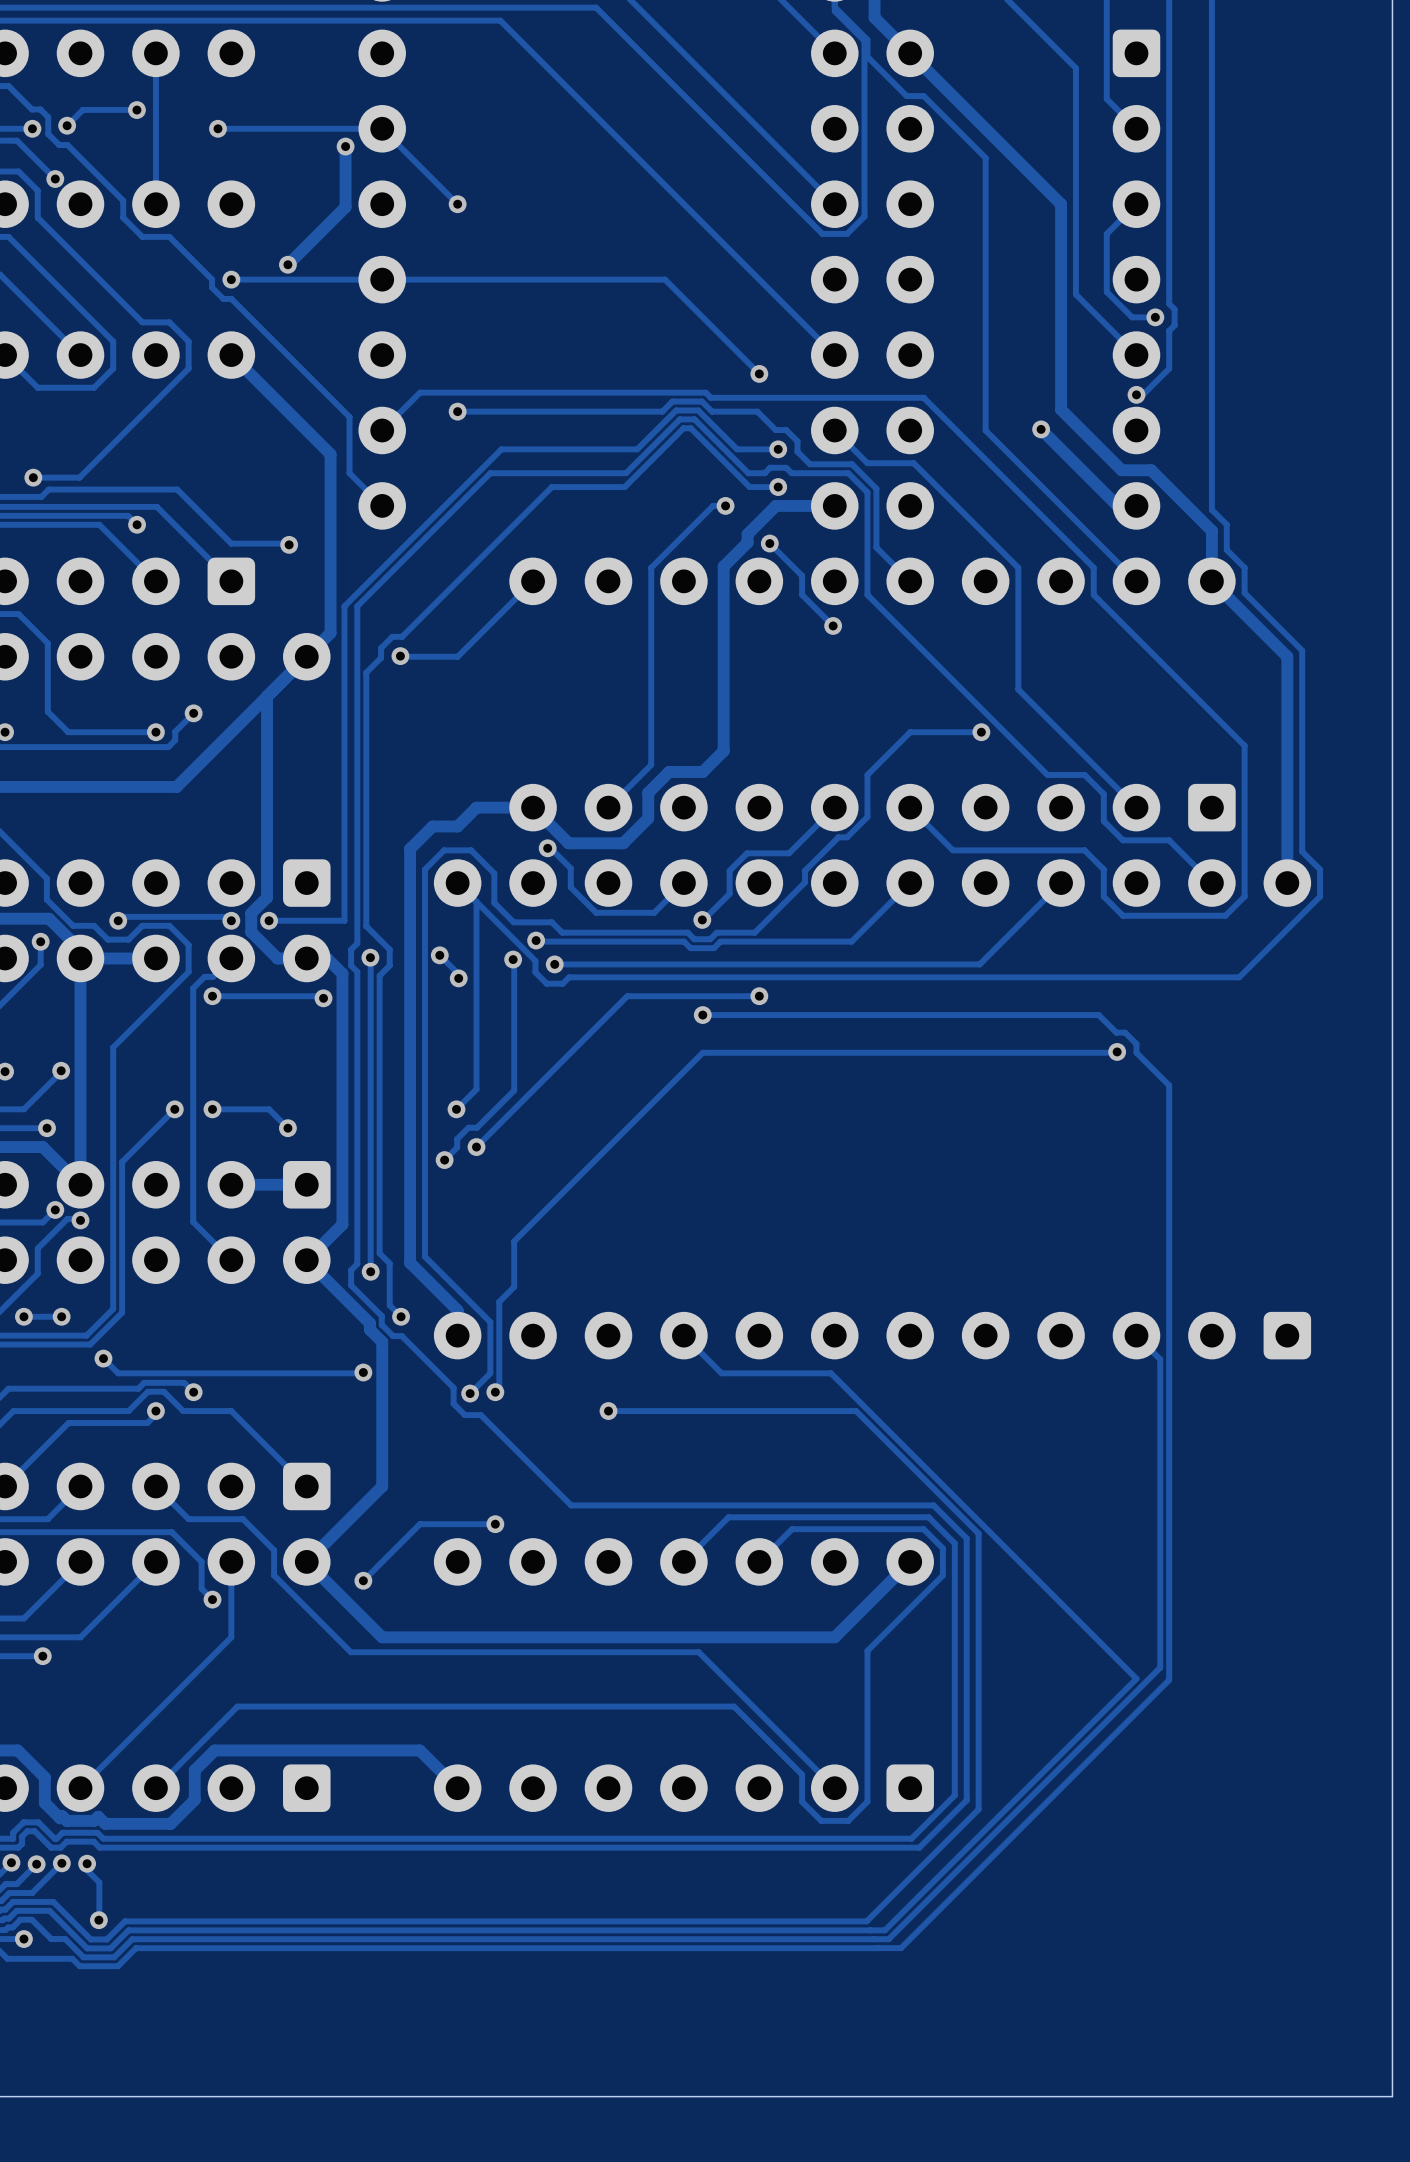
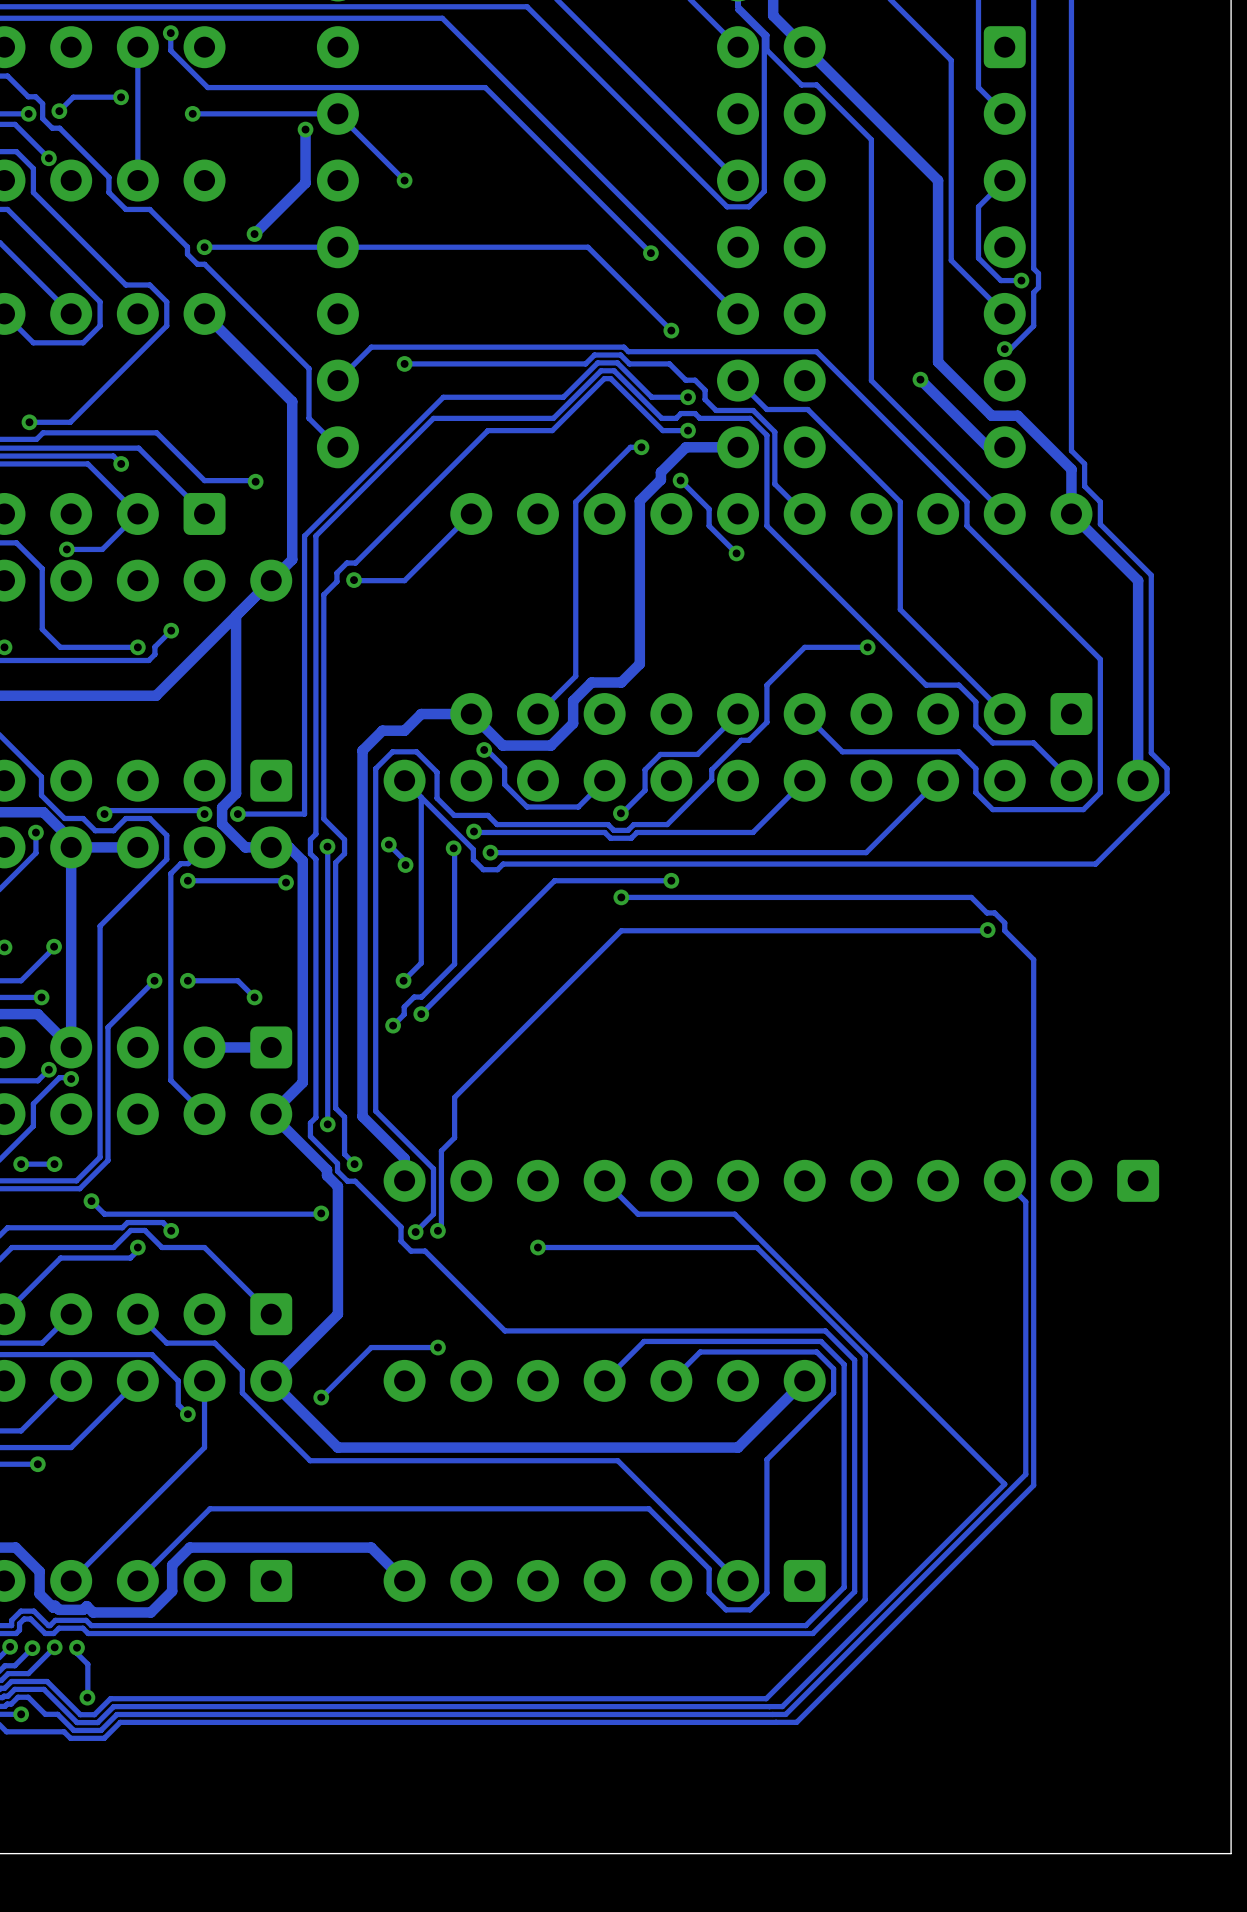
track: none -> (170, 33) (170, 50) (207, 87) (485, 87) (650, 253)
via: none -> (170, 33)
via: none -> (650, 253)
track: none -> (137, 513) (102, 549) (66, 549)
via: none -> (66, 549)

